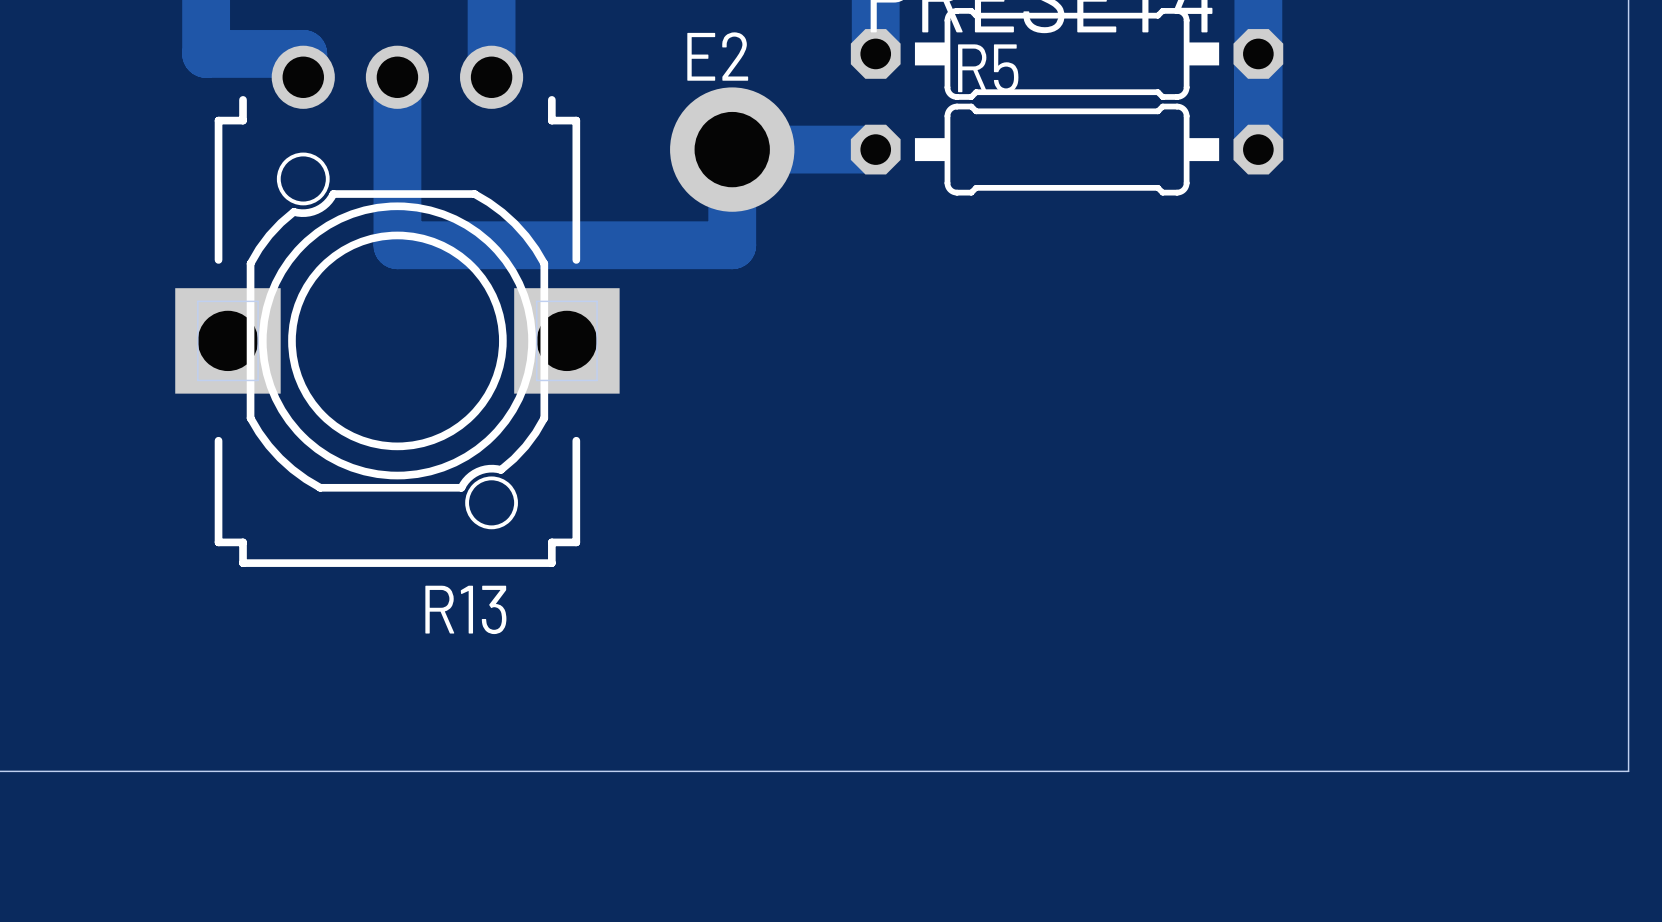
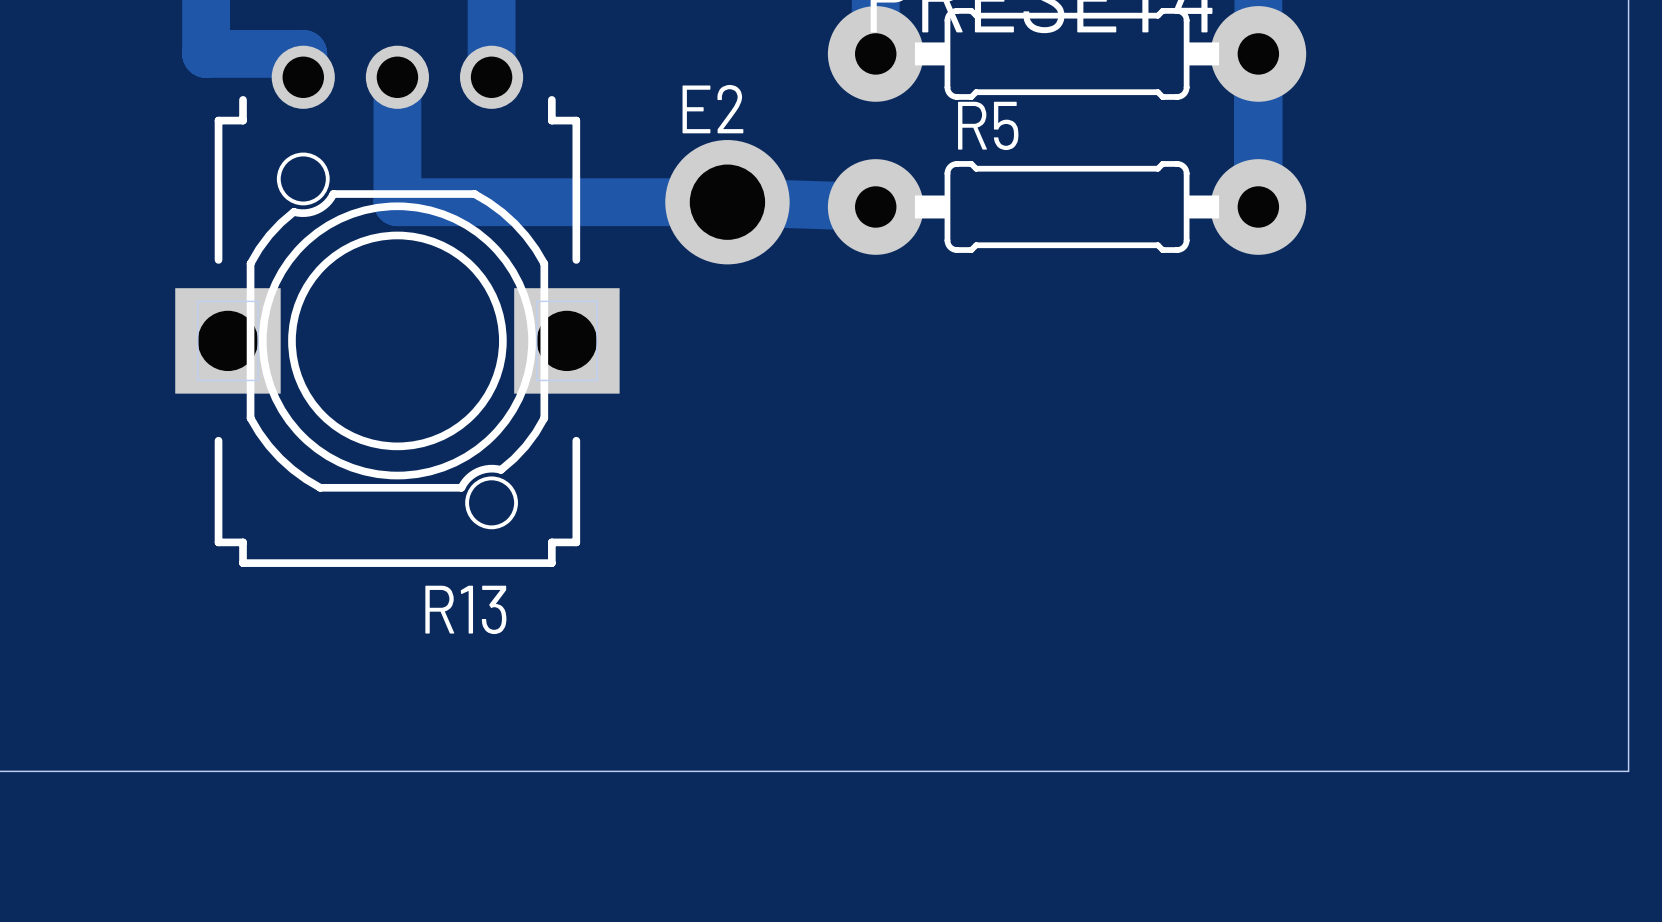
part footprint: [850, 8, 1284, 100] -> [827, 6, 1307, 102]
R5 footprint: [850, 103, 1284, 196] -> [827, 159, 1307, 255]
E2 position: (732, 149) -> (727, 202)
track: (875, 149) (732, 149) (732, 245) (397, 245) (397, 202) -> (875, 206) (727, 202) (397, 202)

